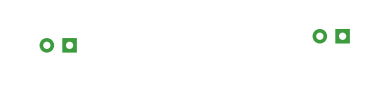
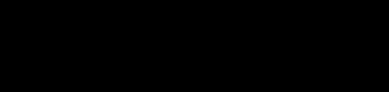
part: (331, 36) -> none
part: (58, 45) -> none

